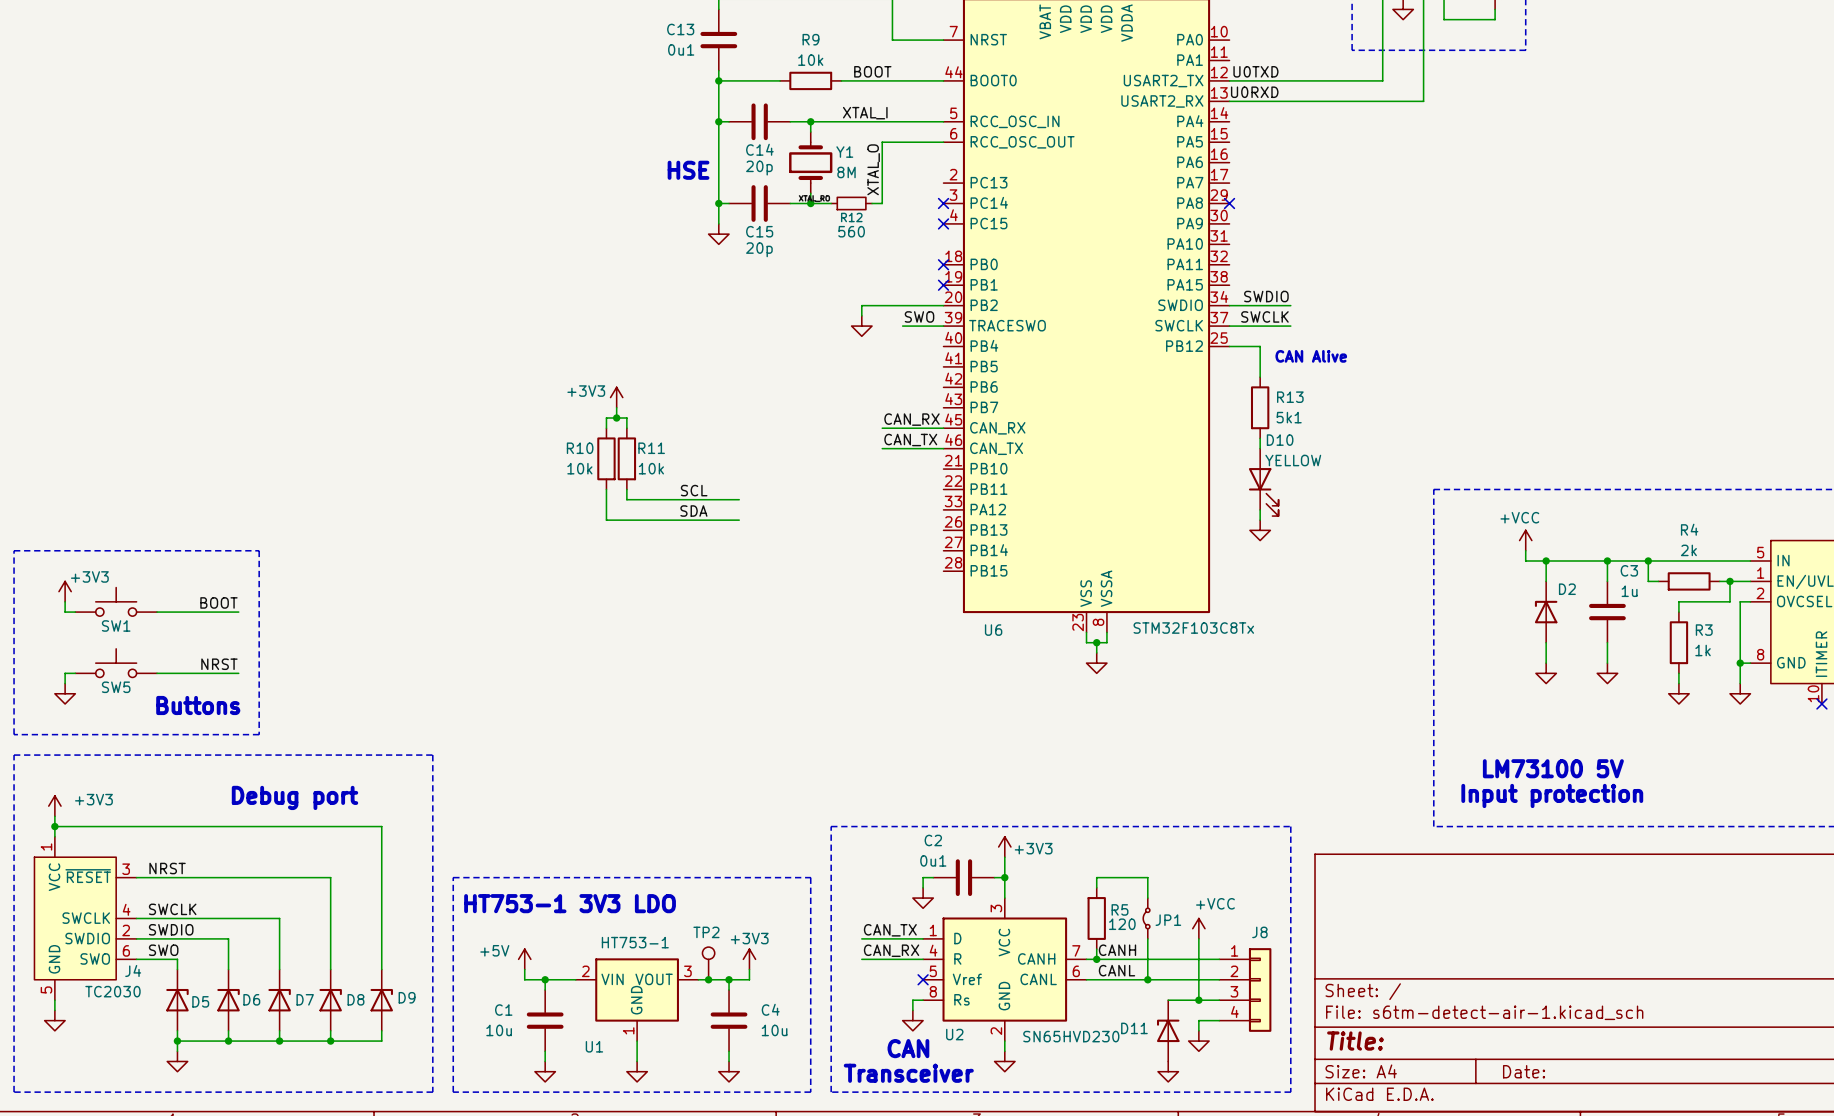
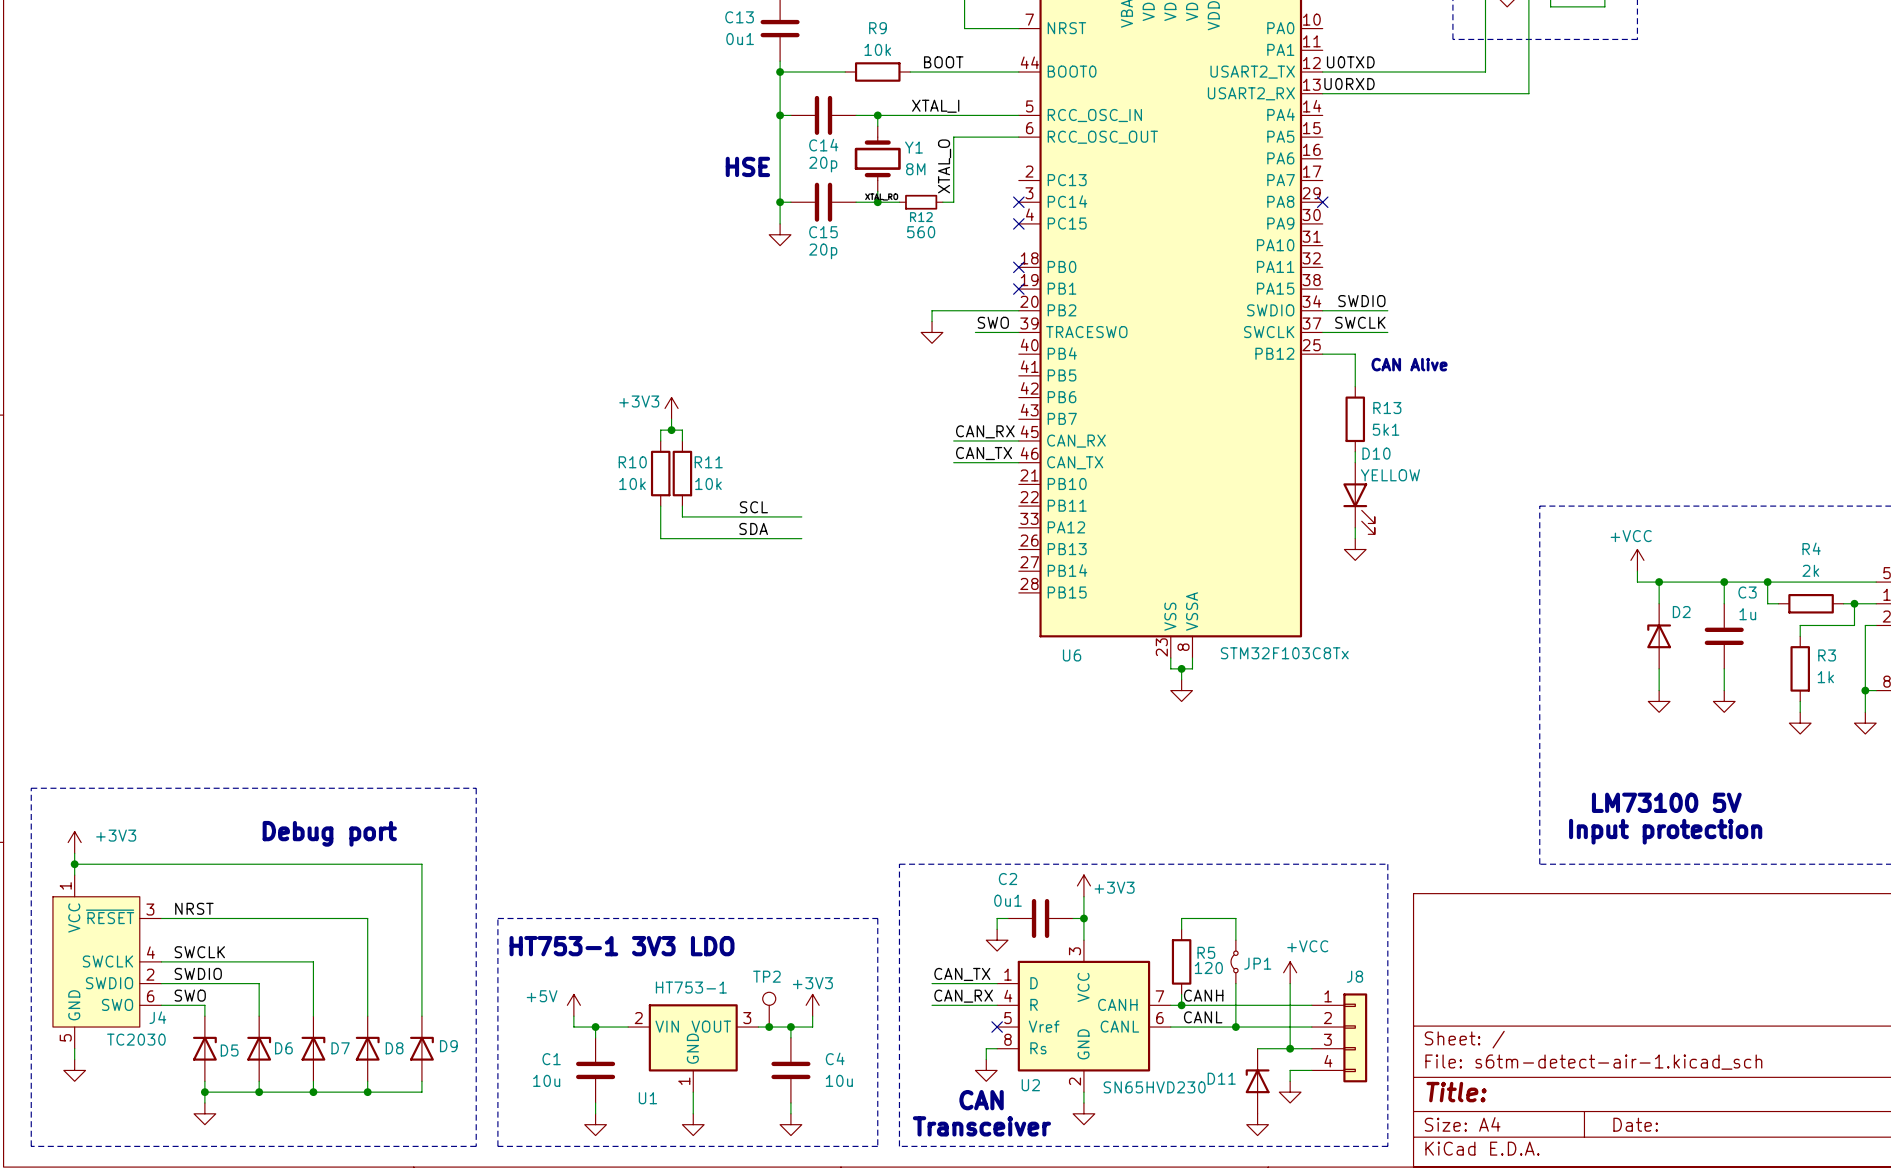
line: (14, 550) (259, 550) (259, 734) (14, 734) (14, 550) -> none
power symbol: +3V3 (65, 591) -> none
wire: (65, 601) (65, 612) (75, 612) -> none
SW1: (116, 601) -> none
label: BOOT (218, 602) -> none
wire: (157, 612) (238, 612) -> none
SW5: (116, 663) -> none
label: NRST (219, 664) -> none
wire: (75, 673) (65, 673) (65, 683) -> none
wire: (157, 673) (238, 673) -> none
power symbol: (65, 693) -> none
text: Buttons (198, 705) -> none

